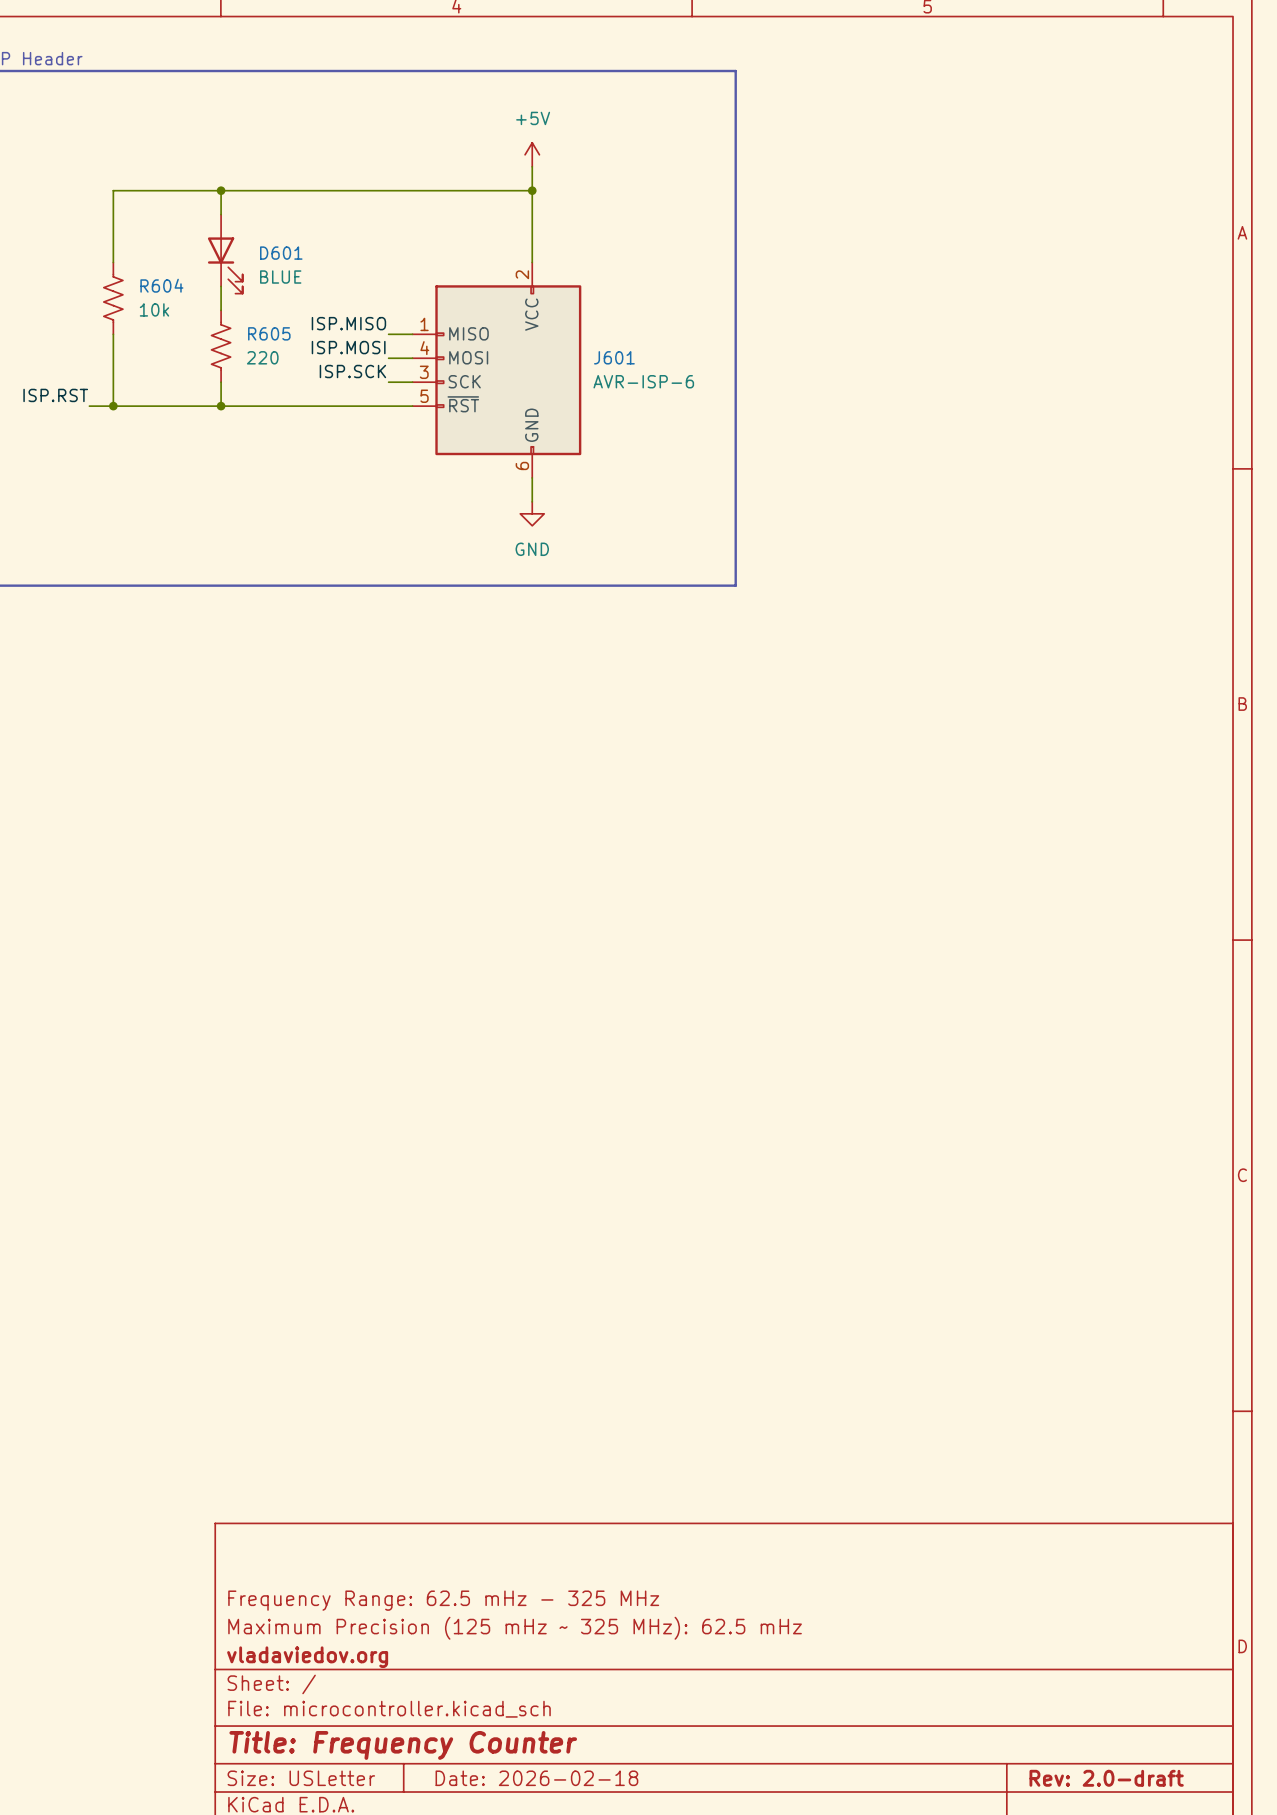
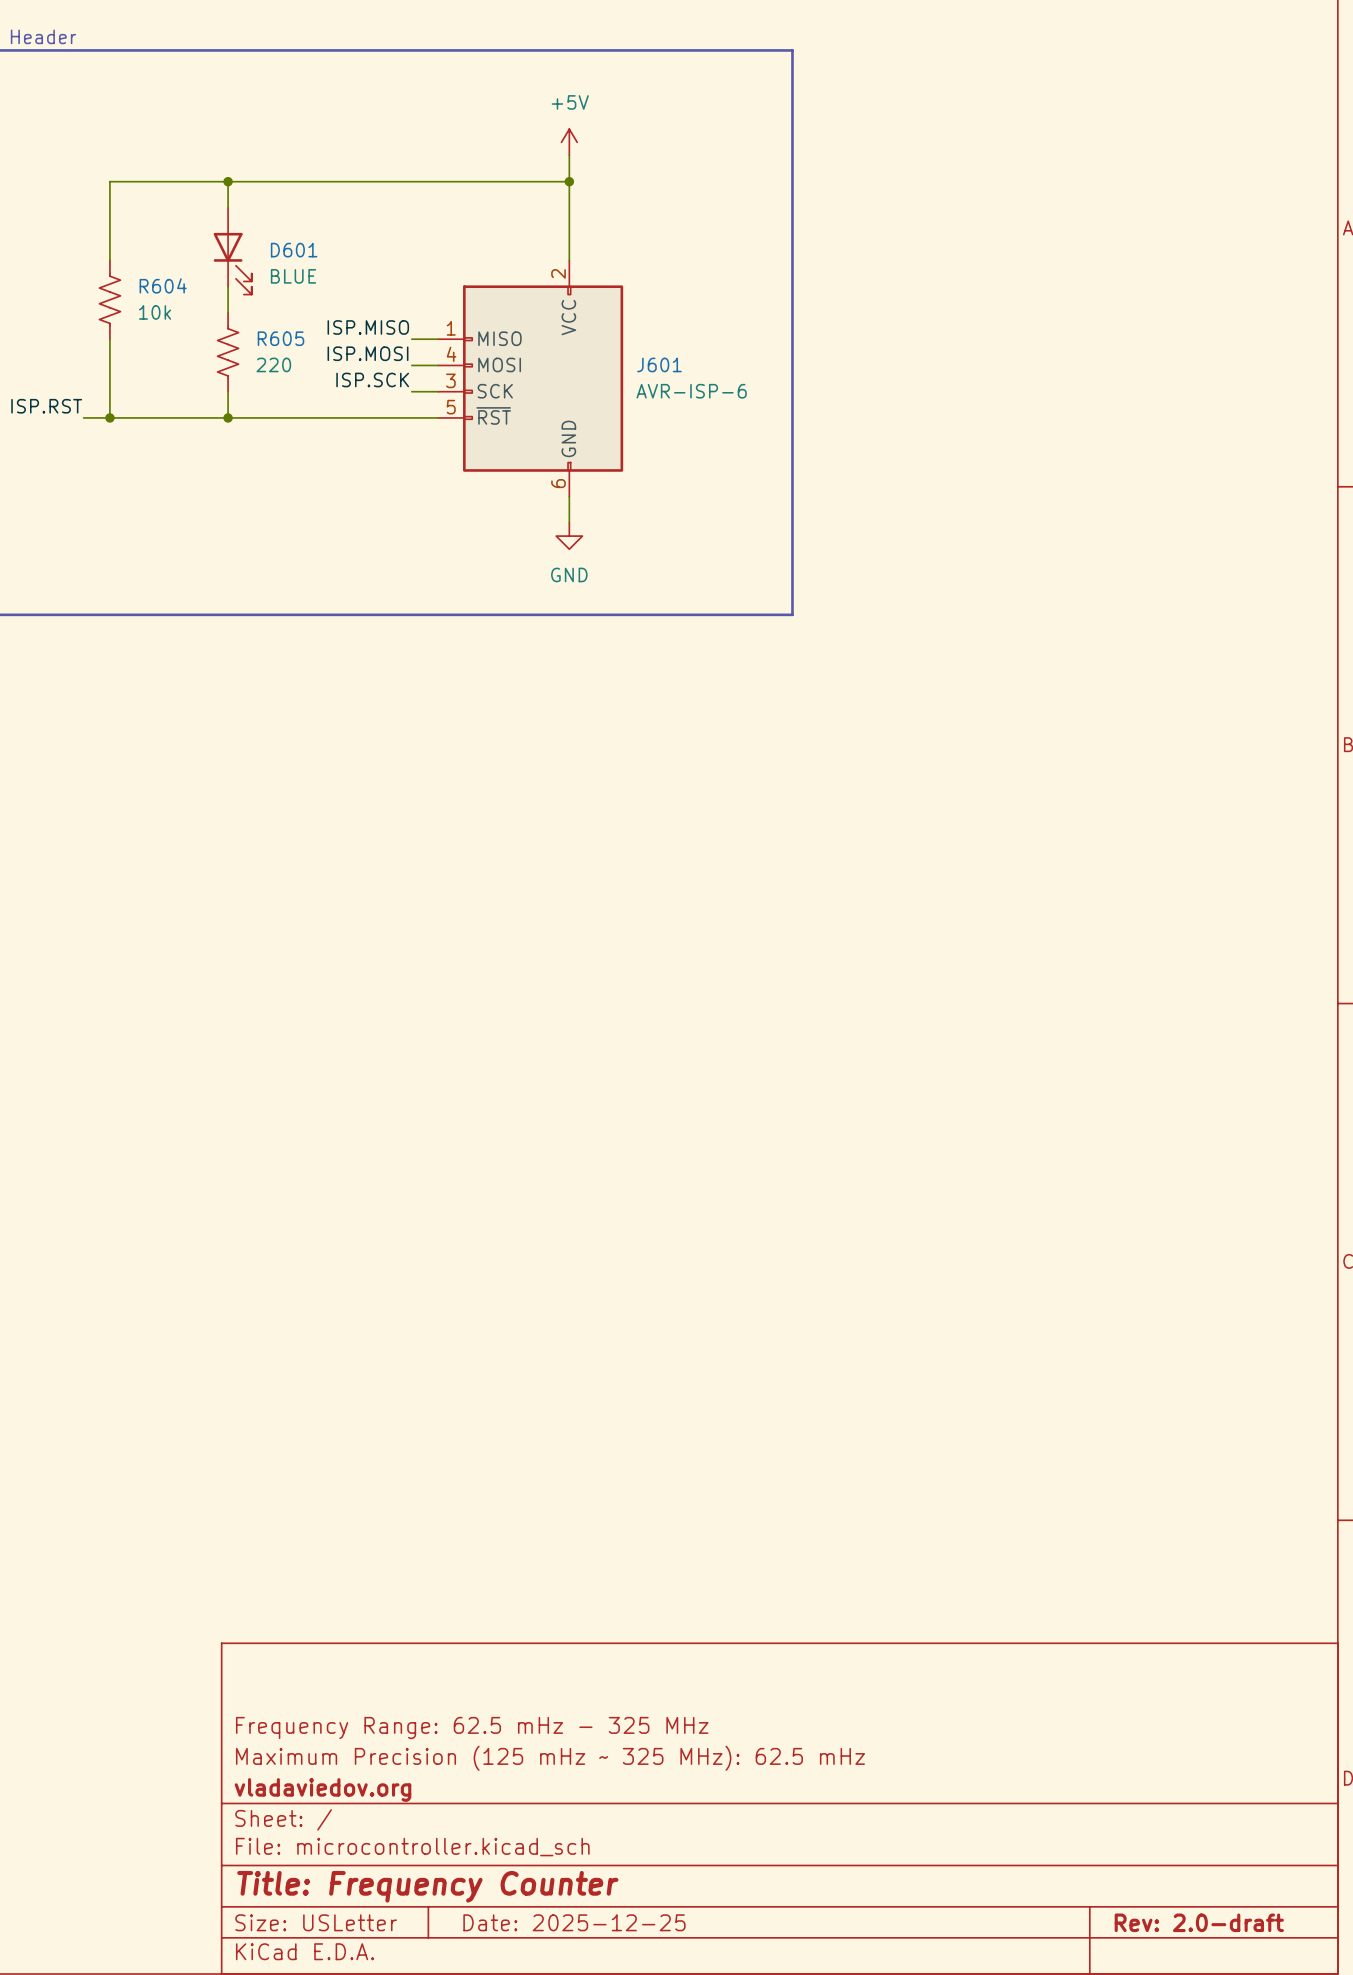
title block: Date: 2026-02-18 (536, 1778) -> Date: 2025-12-25 (574, 1922)

